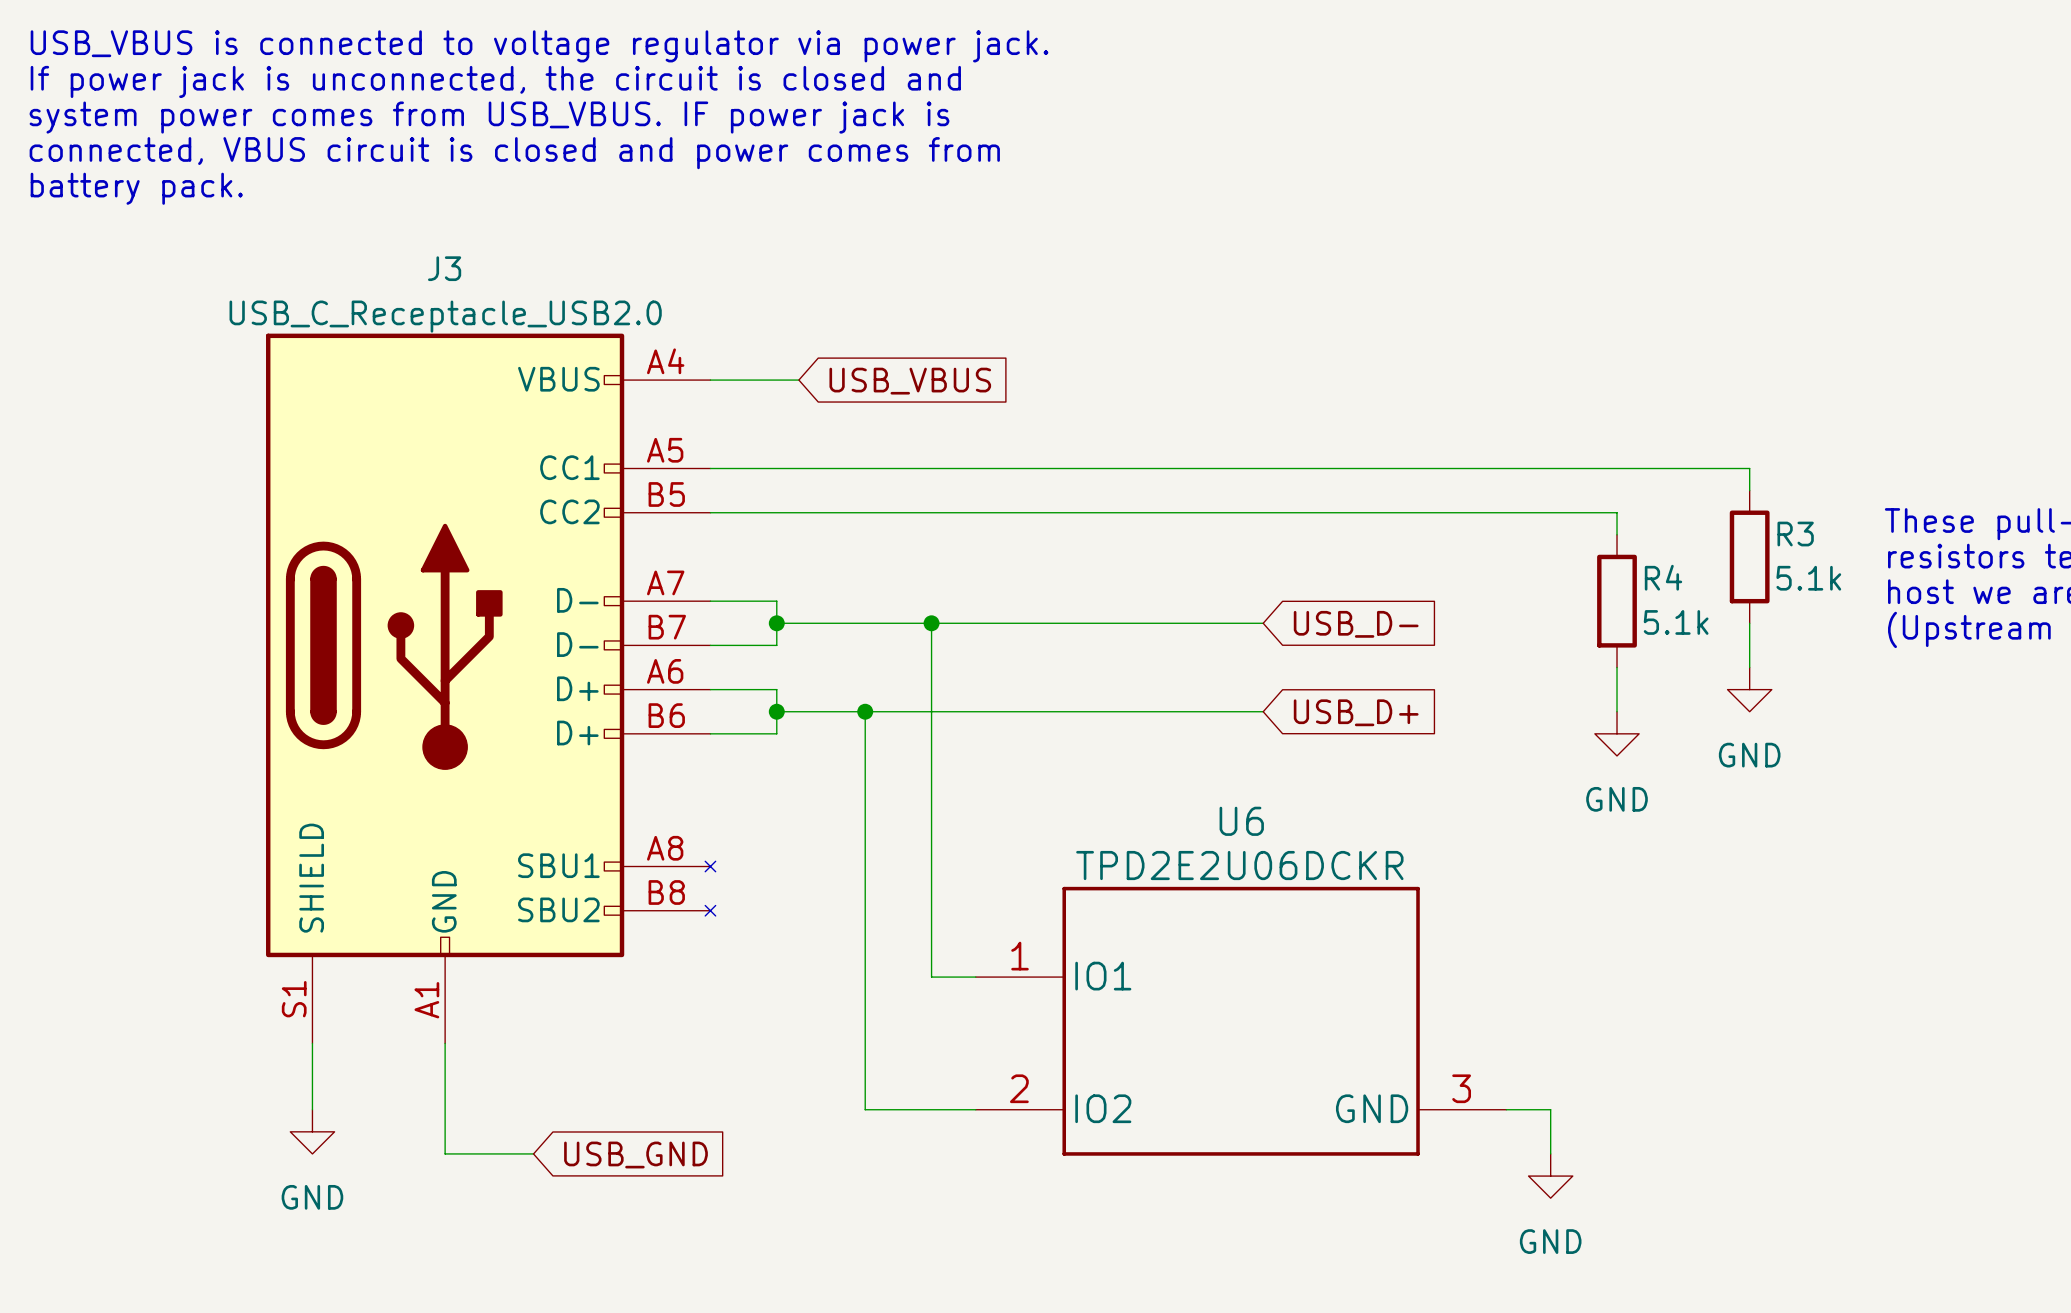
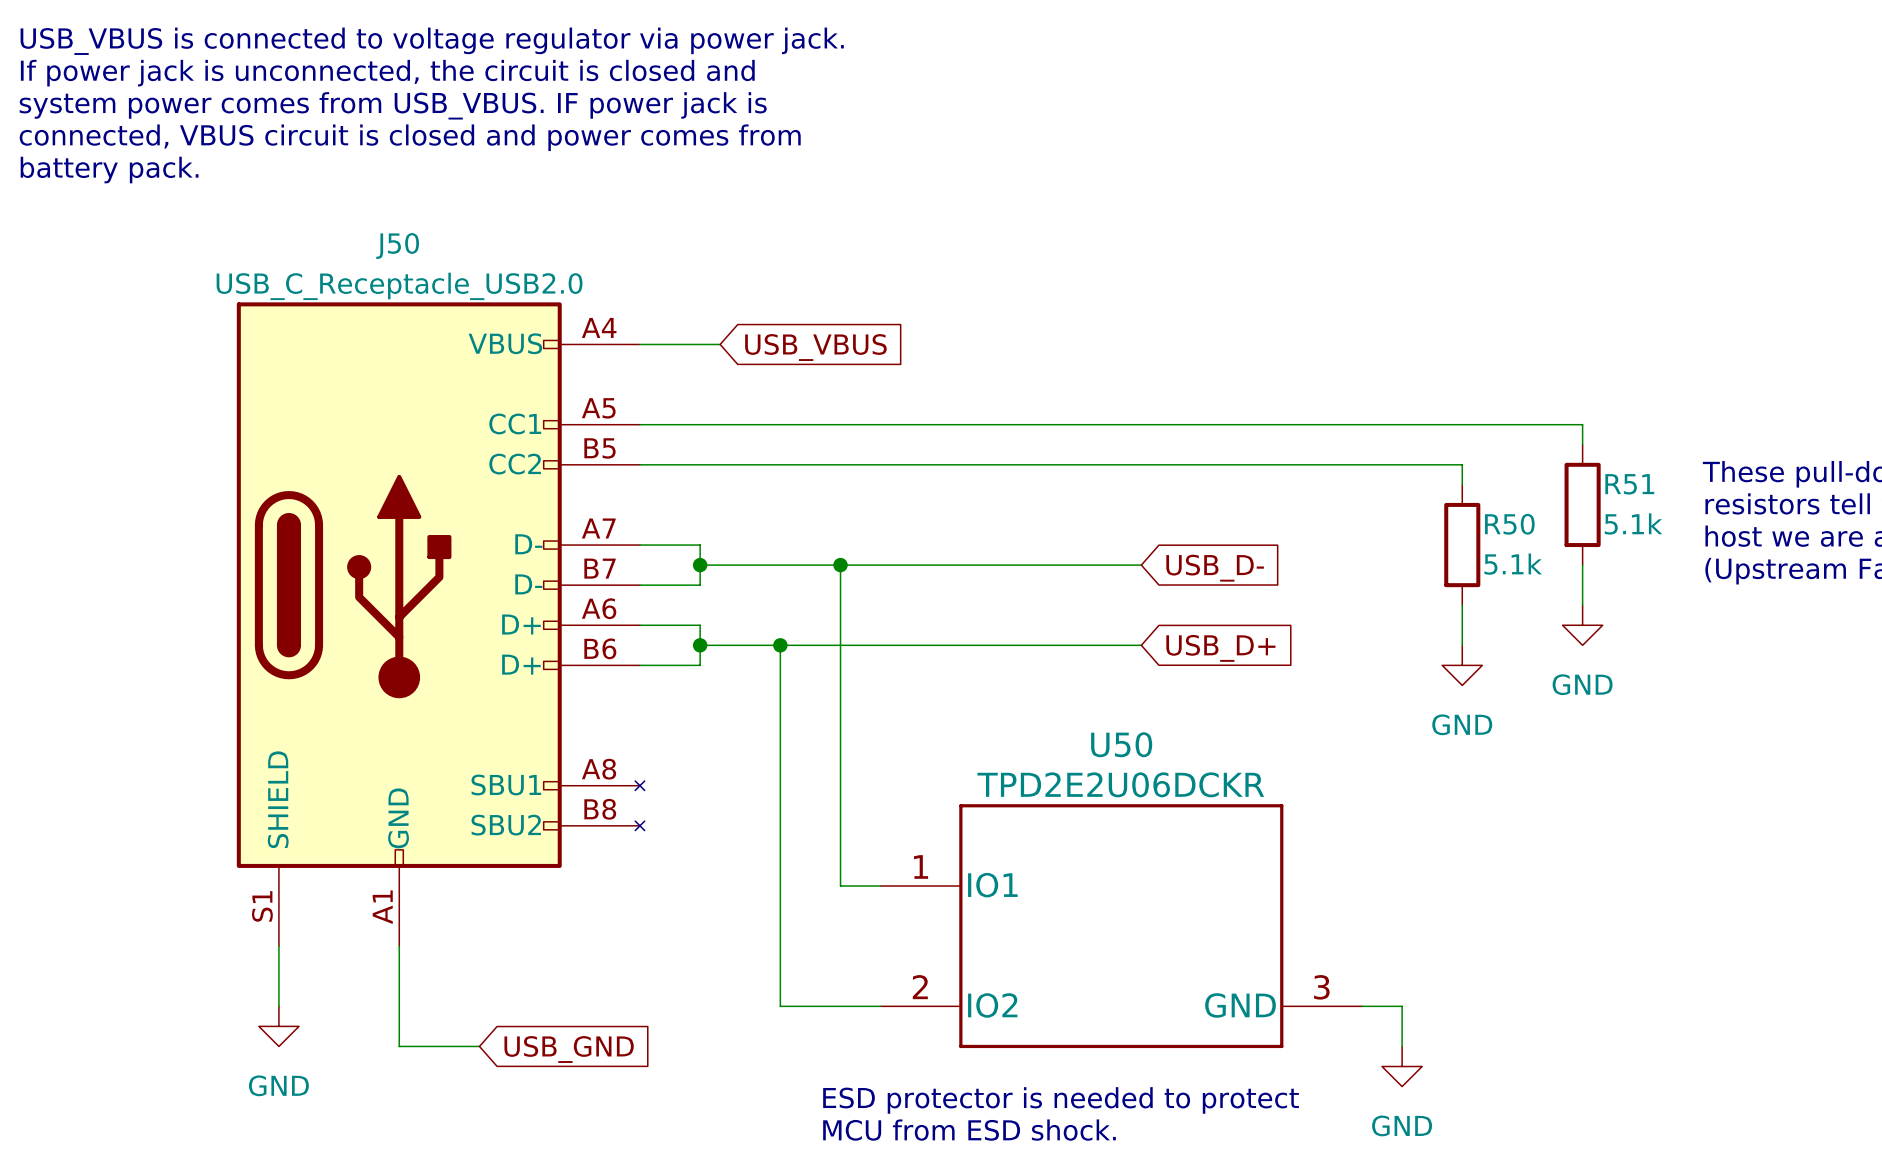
J3 name: J3 (444, 268) -> J50 (397, 246)
R3 name: R3 (1795, 534) -> R51 (1629, 484)
R4 name: R4 (1663, 577) -> R50 (1509, 524)
U6 name: U6 (1241, 821) -> U50 (1121, 744)
text: none -> ESD protector is needed to protect (1061, 1100)
text: none -> MCU from ESD shock. (969, 1130)

